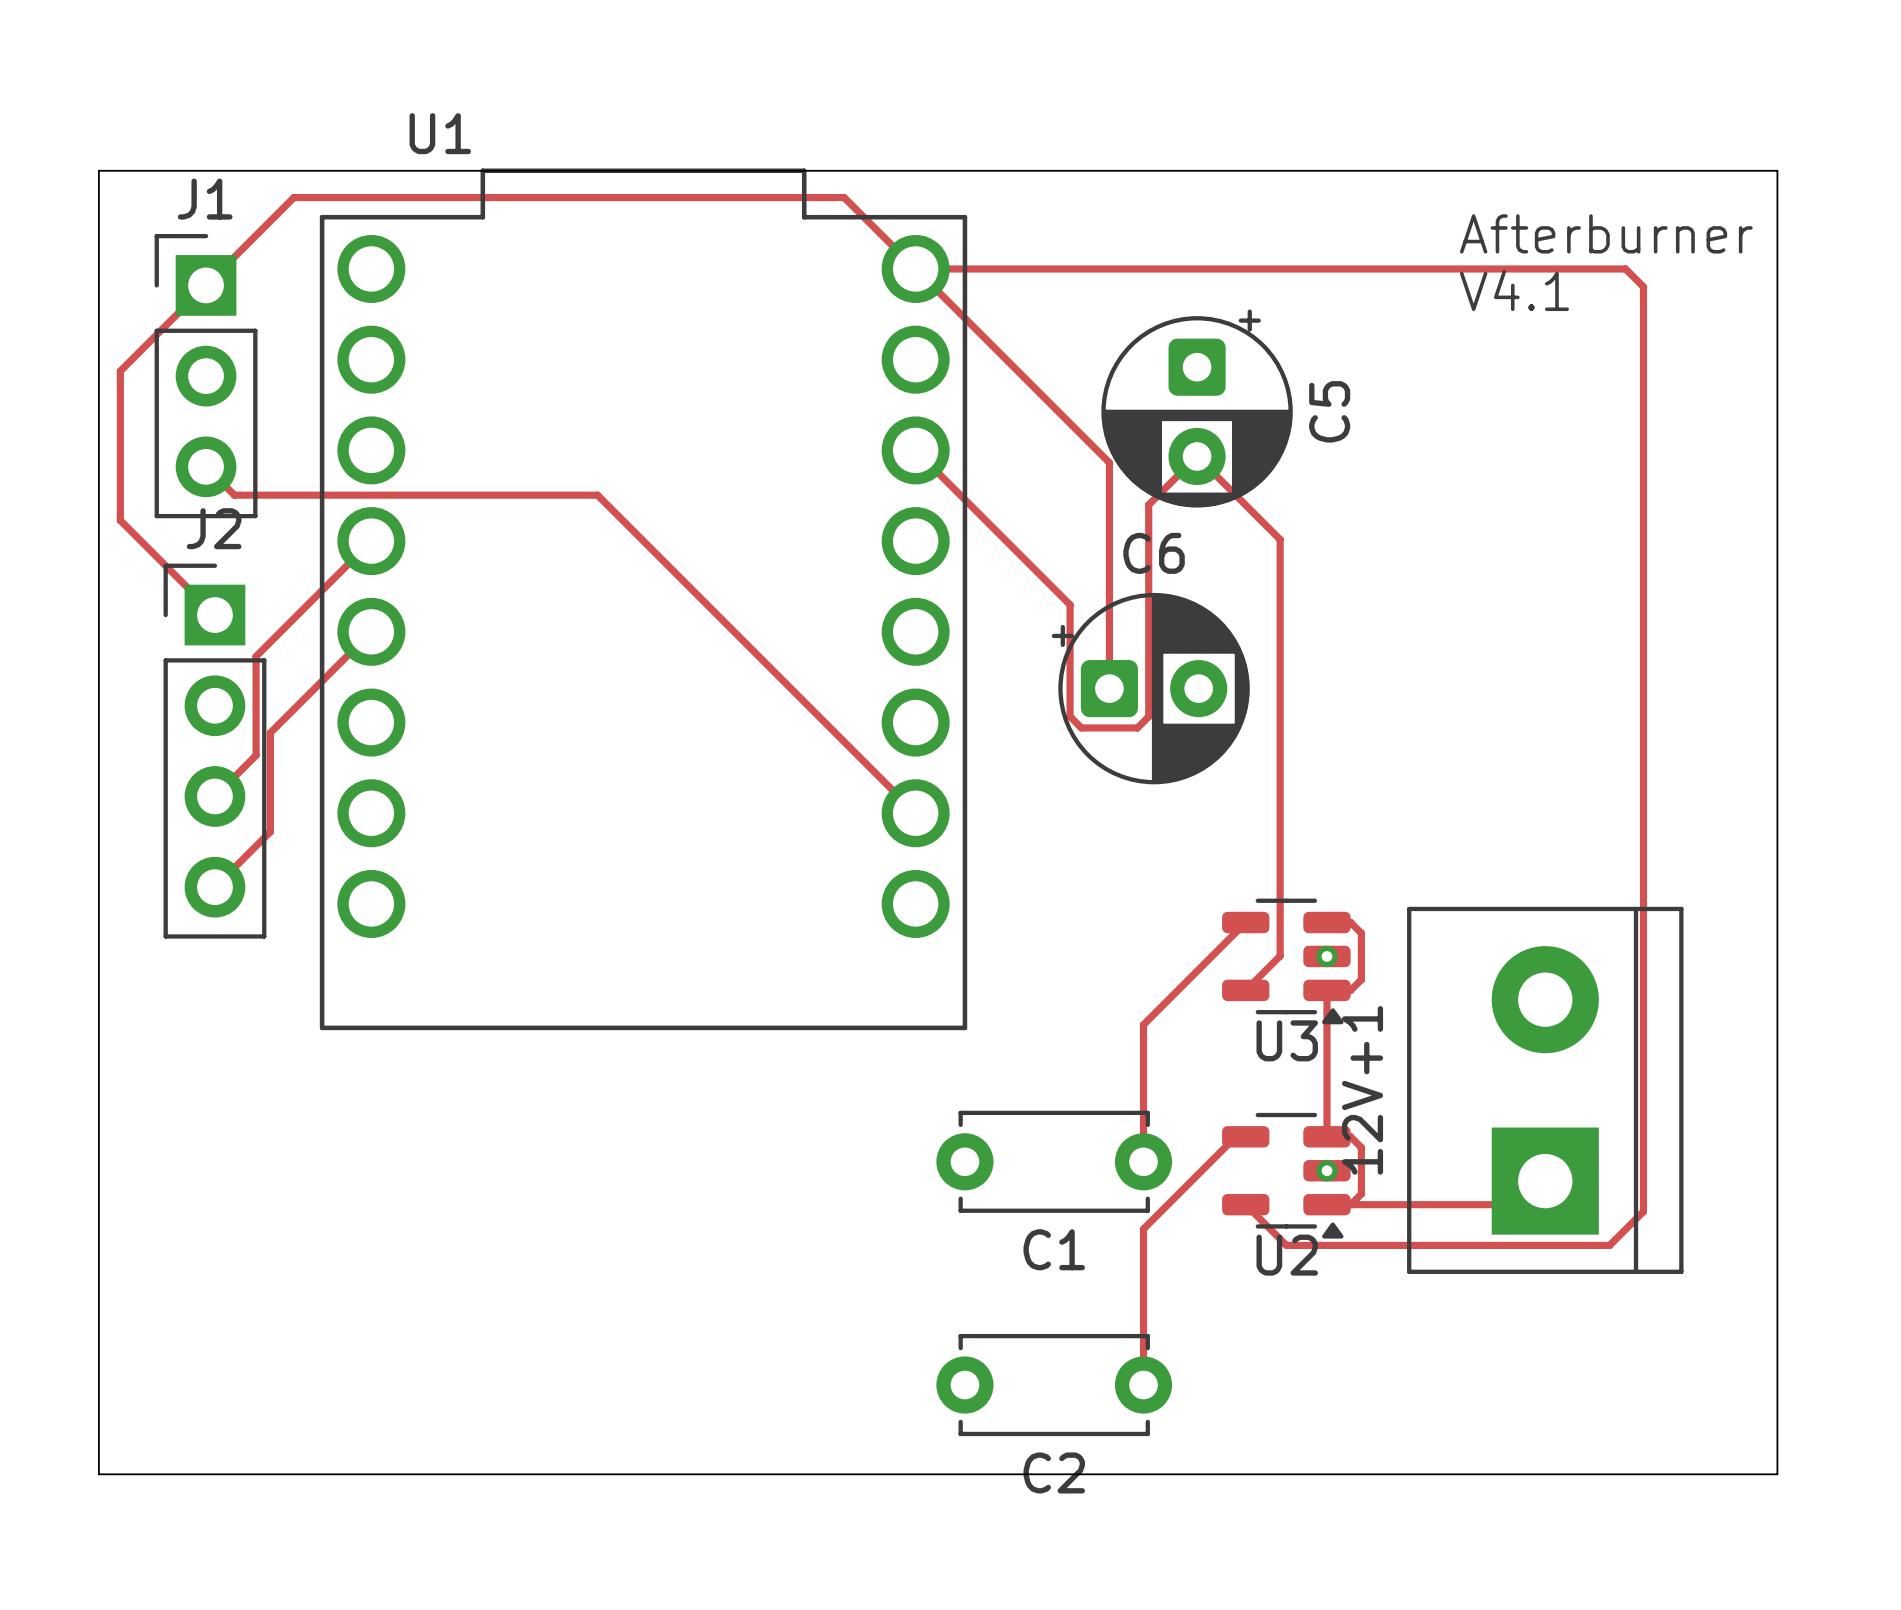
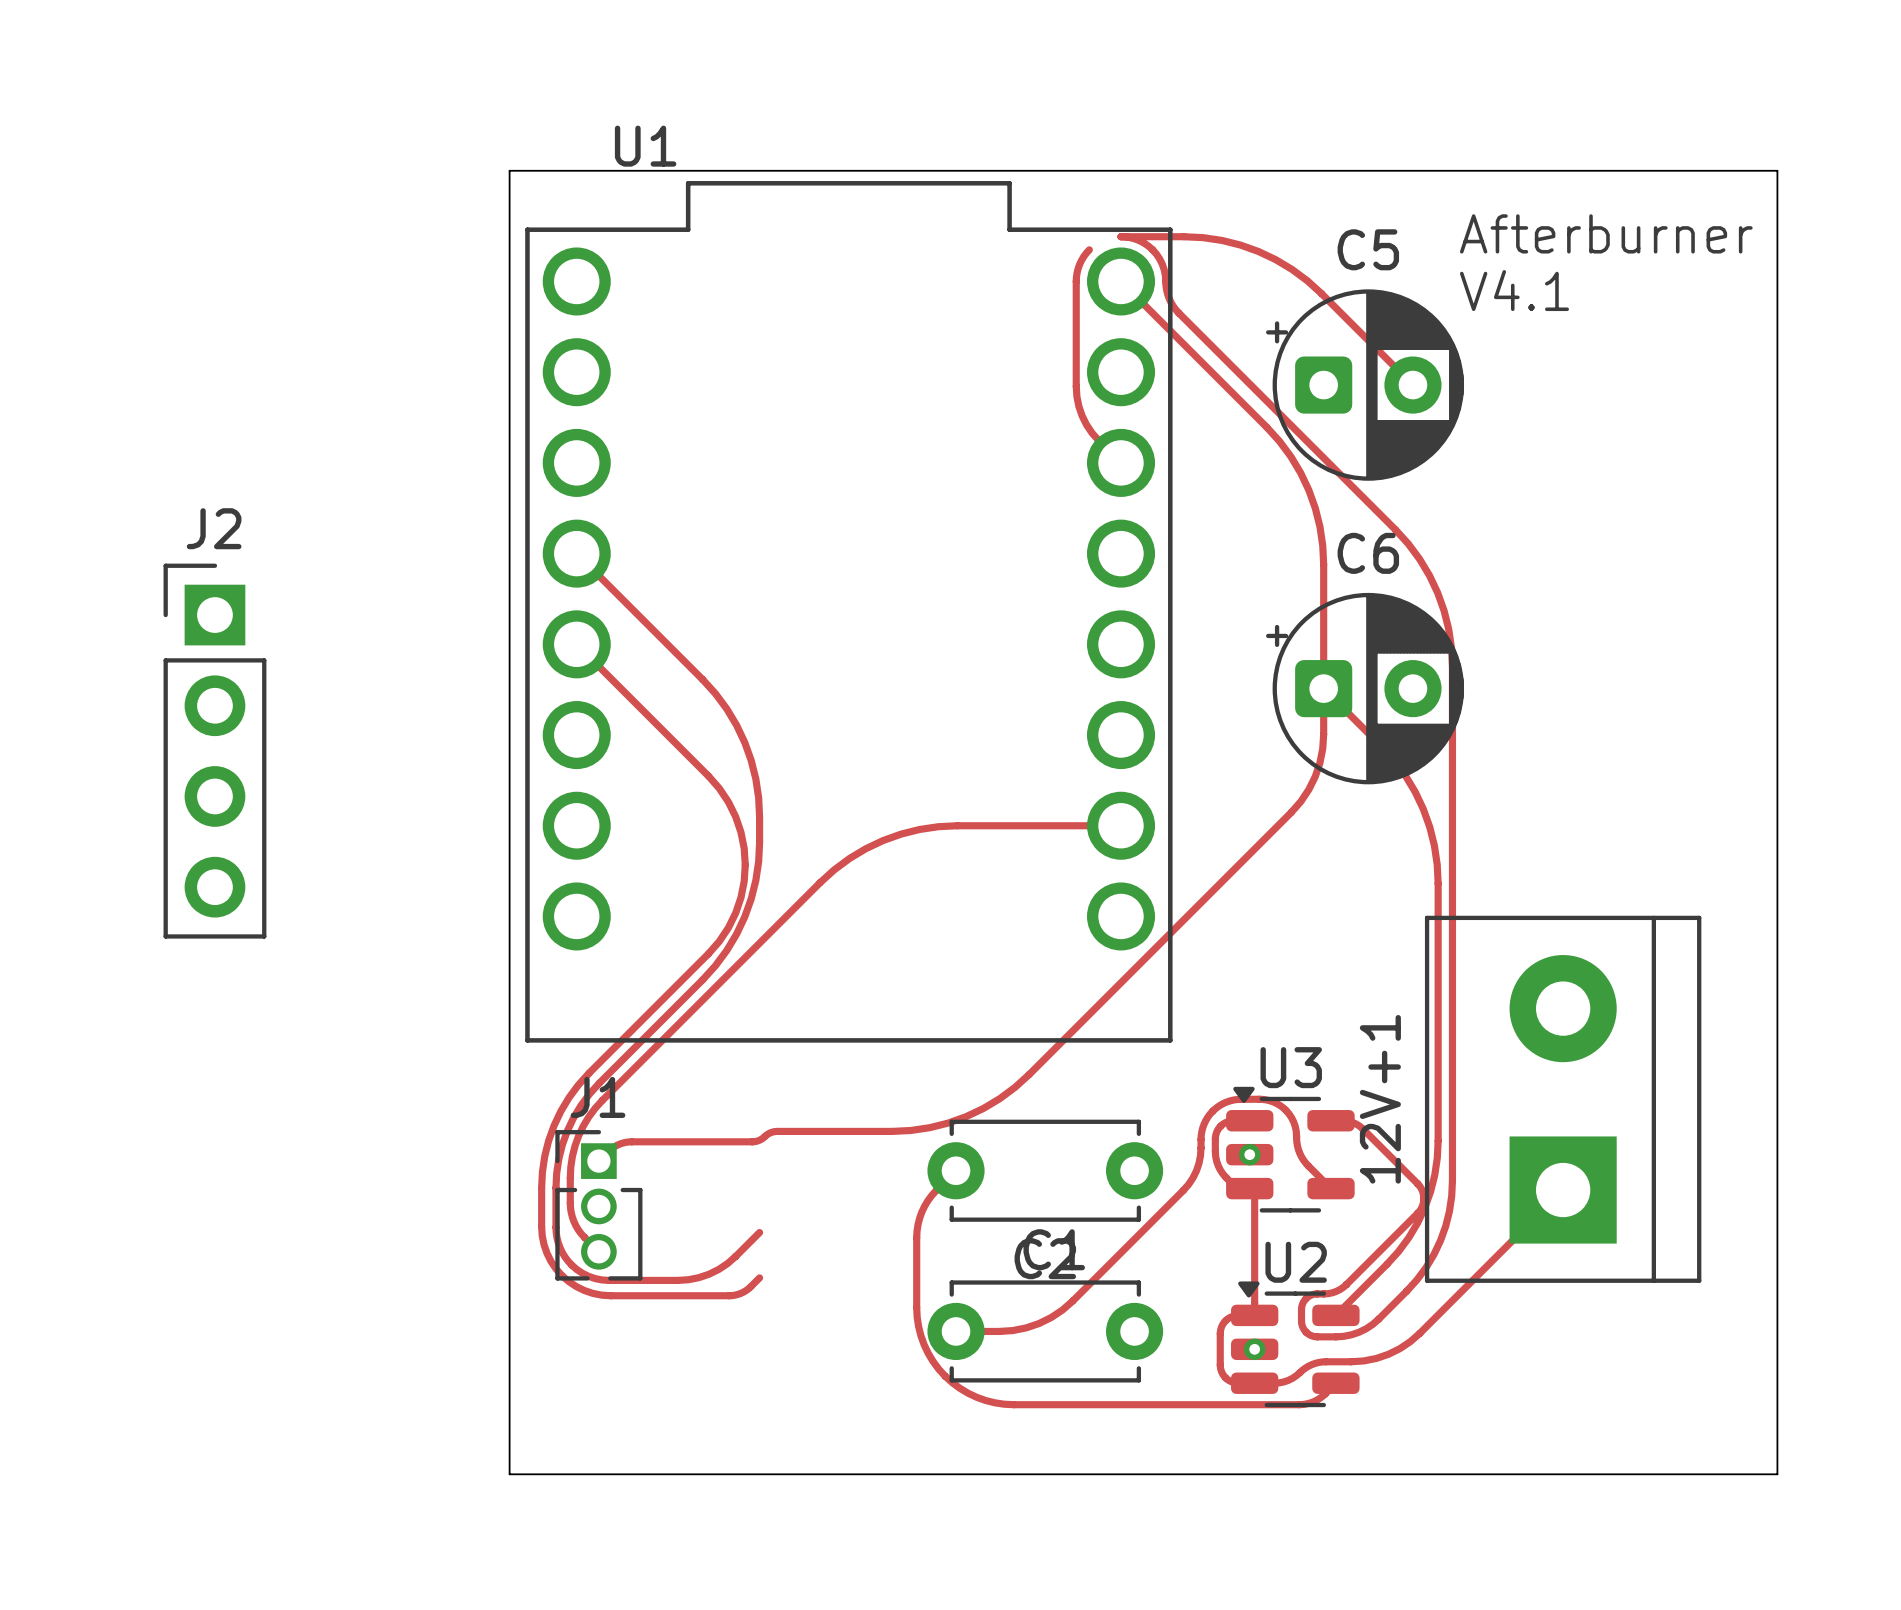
board edge: (509, 170) (98, 170) (98, 1474) (509, 1474) -> (509, 170) (509, 1474)
J1 footprint: [154, 233, 258, 519] -> [555, 1130, 643, 1281]
track: none -> (1121, 236) (1203, 237) (1240, 245) (1275, 259) (1307, 280) (1321, 293) (1412, 385)
track: none -> (1121, 236) (1138, 240) (1152, 249) (1162, 264) (1167, 294) (1175, 309) (1408, 543) (1429, 575) (1444, 610) (1448, 629) (1452, 667) (1452, 1180) (1449, 1211) (1440, 1240) (1426, 1267) (1406, 1291) (1378, 1319) (1366, 1328) (1351, 1334) (1315, 1336) (1306, 1332) (1302, 1325) (1301, 1308) (1305, 1299) (1312, 1294) (1332, 1292) (1343, 1287) (1417, 1213) (1423, 1201) (1423, 1193) (1419, 1185) (1360, 1127) (1348, 1121) (1331, 1120)
track: none -> (1089, 249) (1079, 264) (1076, 277) (1076, 396) (1086, 424) (1098, 440) (1121, 462)
track: (915, 268) (1625, 268) (1643, 286) (1643, 1211) (1609, 1245) (1286, 1245) (1245, 1204) -> none
track: none -> (1121, 281) (1279, 441) (1300, 473) (1308, 490) (1319, 526) (1323, 564) (1322, 748) (1315, 776) (1308, 789) (1291, 812) (1029, 1074) (999, 1098) (983, 1108) (948, 1123) (910, 1130) (775, 1131) (759, 1140) (752, 1141) (628, 1141) (613, 1147) (598, 1161)
C5 rotation: 0° (1197, 408) -> 90° counterclockwise (1365, 385)
C5 position: (1197, 408) -> (1365, 385)
track: (915, 450) (1070, 604) (1070, 716) (1081, 727) (1137, 727) (1148, 716) (1148, 504) (1197, 456) (1280, 539) (1280, 955) (1245, 990) -> none
track: (206, 466) (234, 495) (597, 495) (915, 813) -> none
track: (371, 541) (256, 656) (256, 755) (214, 796) -> none
track: none -> (576, 553) (702, 679) (726, 709) (744, 742) (755, 779) (758, 797) (759, 842) (755, 880) (751, 898) (744, 916) (726, 950) (702, 979) (599, 1083) (573, 1118) (562, 1144) (556, 1173) (555, 1227) (558, 1242) (562, 1252) (571, 1264) (582, 1273) (595, 1278) (609, 1280) (677, 1280) (699, 1277) (718, 1269) (735, 1256) (759, 1232)
U1 position: (643, 599) -> (848, 611)
track: (214, 615) (120, 520) (120, 371) (293, 197) (844, 197) (1109, 462) (1109, 688) (1104, 693) -> none
track: (371, 631) (270, 732) (270, 831) (214, 887) -> none
track: none -> (576, 644) (719, 788) (735, 816) (740, 832) (745, 864) (740, 897) (728, 927) (719, 941) (589, 1073) (569, 1097) (560, 1111) (548, 1140) (542, 1172) (541, 1226) (543, 1244) (550, 1261) (561, 1275) (584, 1290) (601, 1295) (732, 1295) (746, 1290) (759, 1277)
C6 position: (1150, 688) -> (1365, 688)
track: none -> (1323, 688) (1394, 760) (1415, 791) (1423, 809) (1434, 845) (1438, 883) (1438, 1140) (1434, 1174) (1424, 1207) (1408, 1237) (1387, 1264) (1335, 1315)
track: none -> (1121, 825) (957, 825) (919, 829) (883, 840) (865, 848) (834, 869) (602, 1100) (588, 1117) (578, 1135) (572, 1156) (570, 1207) (578, 1230) (598, 1251)
track: (1245, 922) (1143, 1024) (1143, 1161) -> none
track: (1326, 922) (1350, 922) (1361, 933) (1361, 979) (1350, 990) (1326, 990) (1326, 1136) (1350, 1136) (1361, 1147) (1361, 1193) (1350, 1204) -> none
via: (1326, 956) -> none
U3 rotation: 0° (1286, 961) -> 180° (1290, 1149)
U3 position: (1286, 961) -> (1290, 1149)
12V+1 position: (1545, 1090) -> (1563, 1099)
track: none -> (1249, 1120) (1225, 1122) (1218, 1128) (1215, 1137) (1216, 1161) (1223, 1174) (1234, 1186) (1250, 1189) (1254, 1195) (1254, 1306) (1247, 1314) (1235, 1315) (1226, 1319) (1220, 1331) (1221, 1370) (1225, 1377) (1233, 1382) (1283, 1381) (1315, 1363) (1363, 1360) (1376, 1358) (1399, 1348) (1419, 1333) (1563, 1190)
track: (1245, 1136) (1235, 1136) (1143, 1229) (1143, 1385) -> none
C1 position: (1054, 1161) -> (1045, 1331)
track: none -> (956, 1170) (931, 1195) (919, 1218) (916, 1237) (917, 1316) (920, 1335) (933, 1361) (952, 1382) (968, 1393) (994, 1402) (1013, 1404) (1299, 1404) (1317, 1399) (1335, 1383)
via position: (1326, 1170) -> (1249, 1154)
U2 rotation: 0° (1286, 1175) -> 180° (1295, 1344)
U2 position: (1286, 1175) -> (1295, 1344)
track: (1545, 1181) (1521, 1204) (1326, 1204) -> none
track: none -> (1331, 1188) (1301, 1156) (1293, 1122) (1283, 1107) (1273, 1102) (1263, 1099) (1237, 1099) (1225, 1102) (1212, 1111) (1204, 1124) (1198, 1163) (1188, 1184) (1062, 1309) (1039, 1323) (1026, 1327) (999, 1331) (956, 1331)
via: none -> (1254, 1349)
C2 position: (1054, 1385) -> (1045, 1170)

